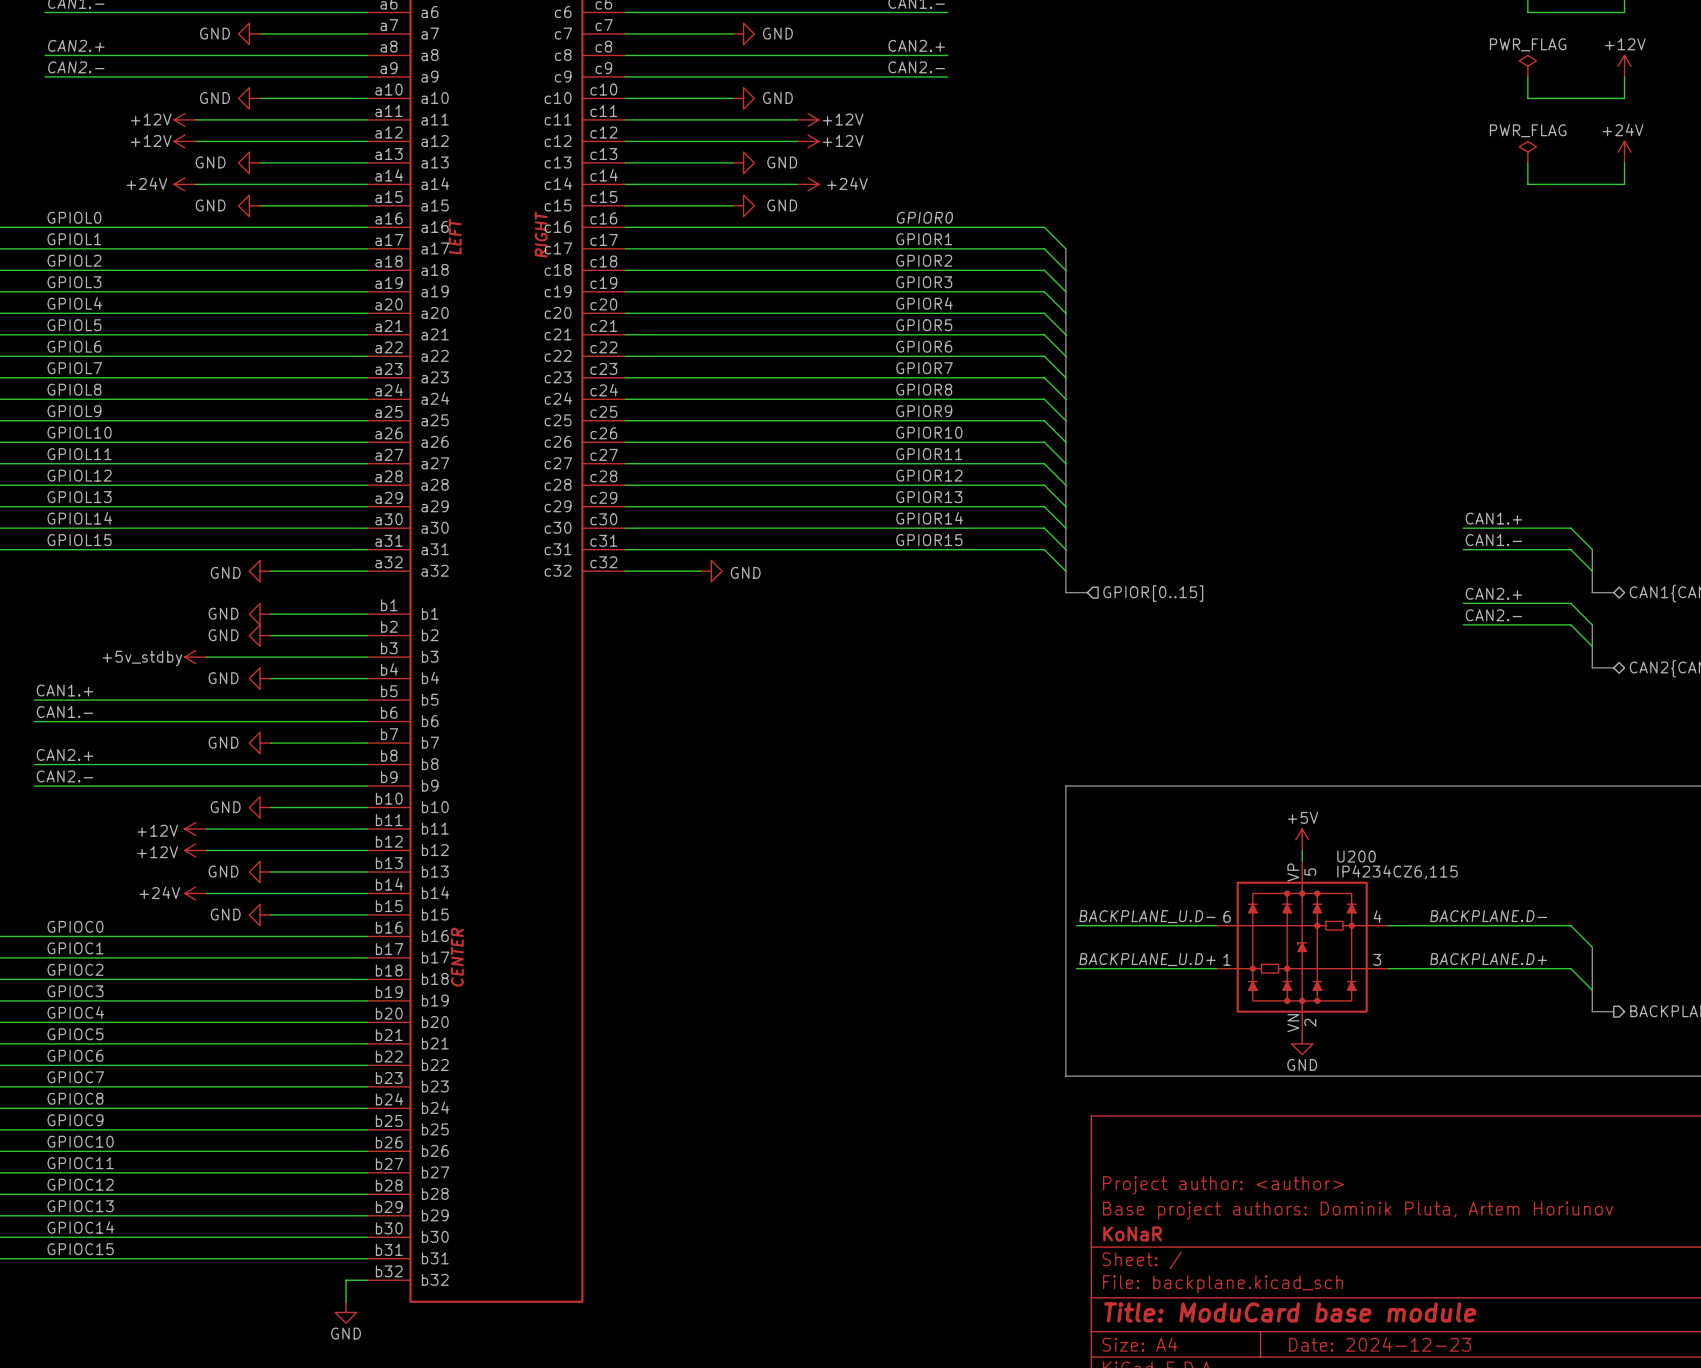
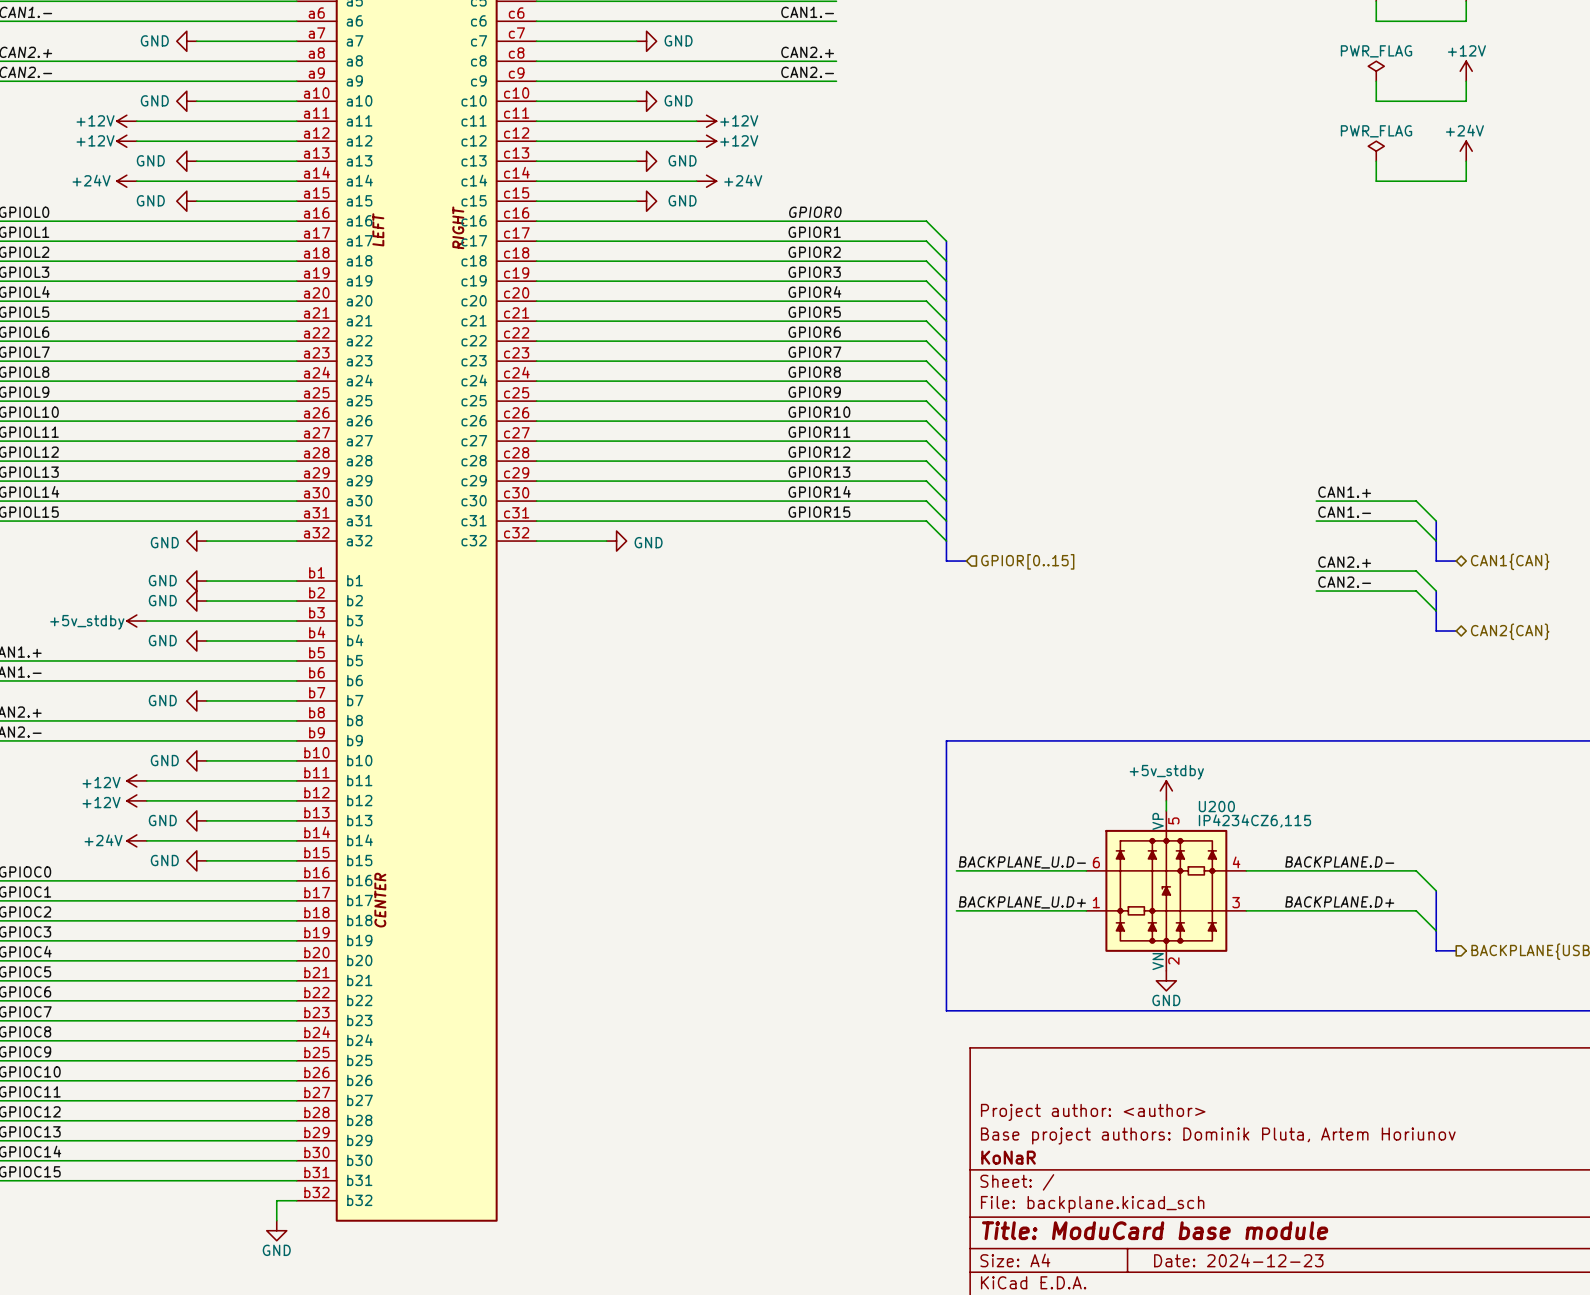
power symbol: +5V (1302, 839) -> +5v_stdby (1166, 790)

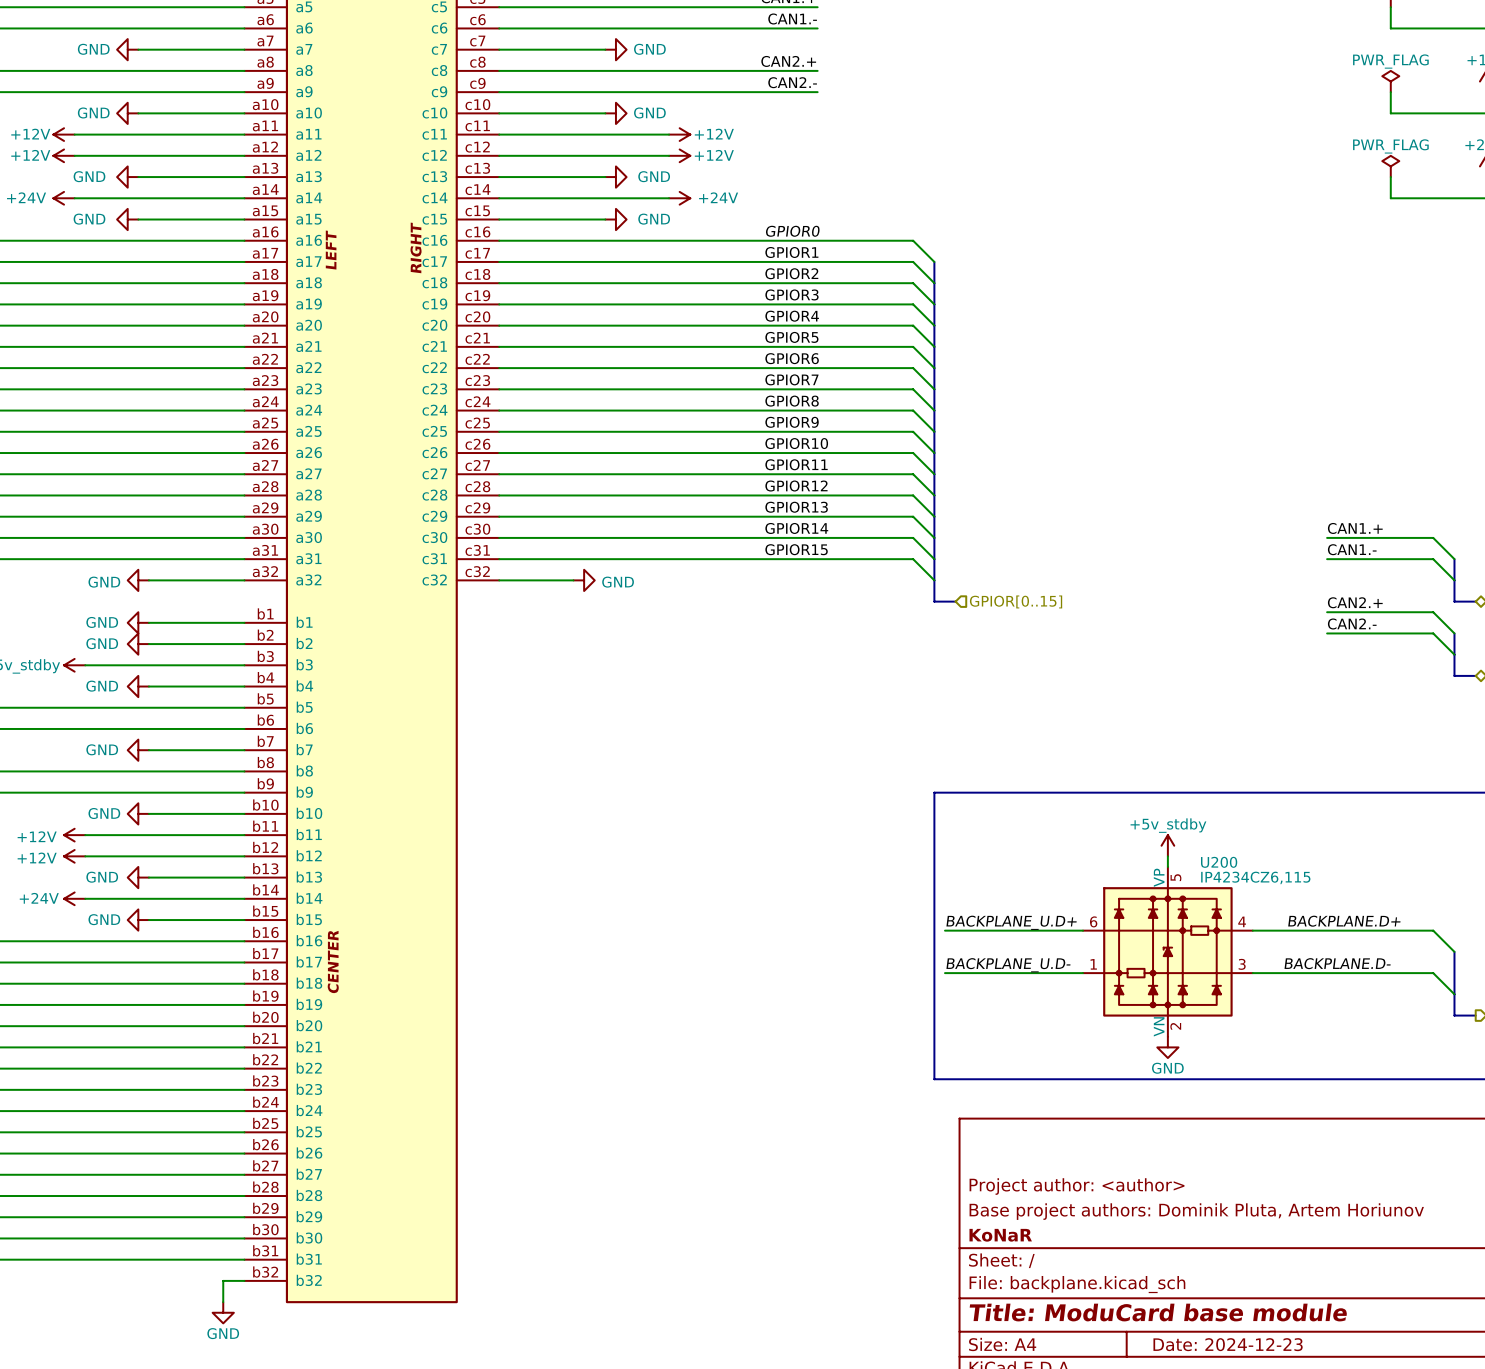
label position: BACKPLANE.D- (1339, 861) -> BACKPLANE.D- (1337, 963)
label: BACKPLANE_U.D- (1022, 862) -> BACKPLANE_U.D+ (1011, 922)
label position: BACKPLANE.D+ (1339, 901) -> BACKPLANE.D+ (1344, 921)
label: BACKPLANE_U.D+ (1022, 902) -> BACKPLANE_U.D- (1008, 965)

